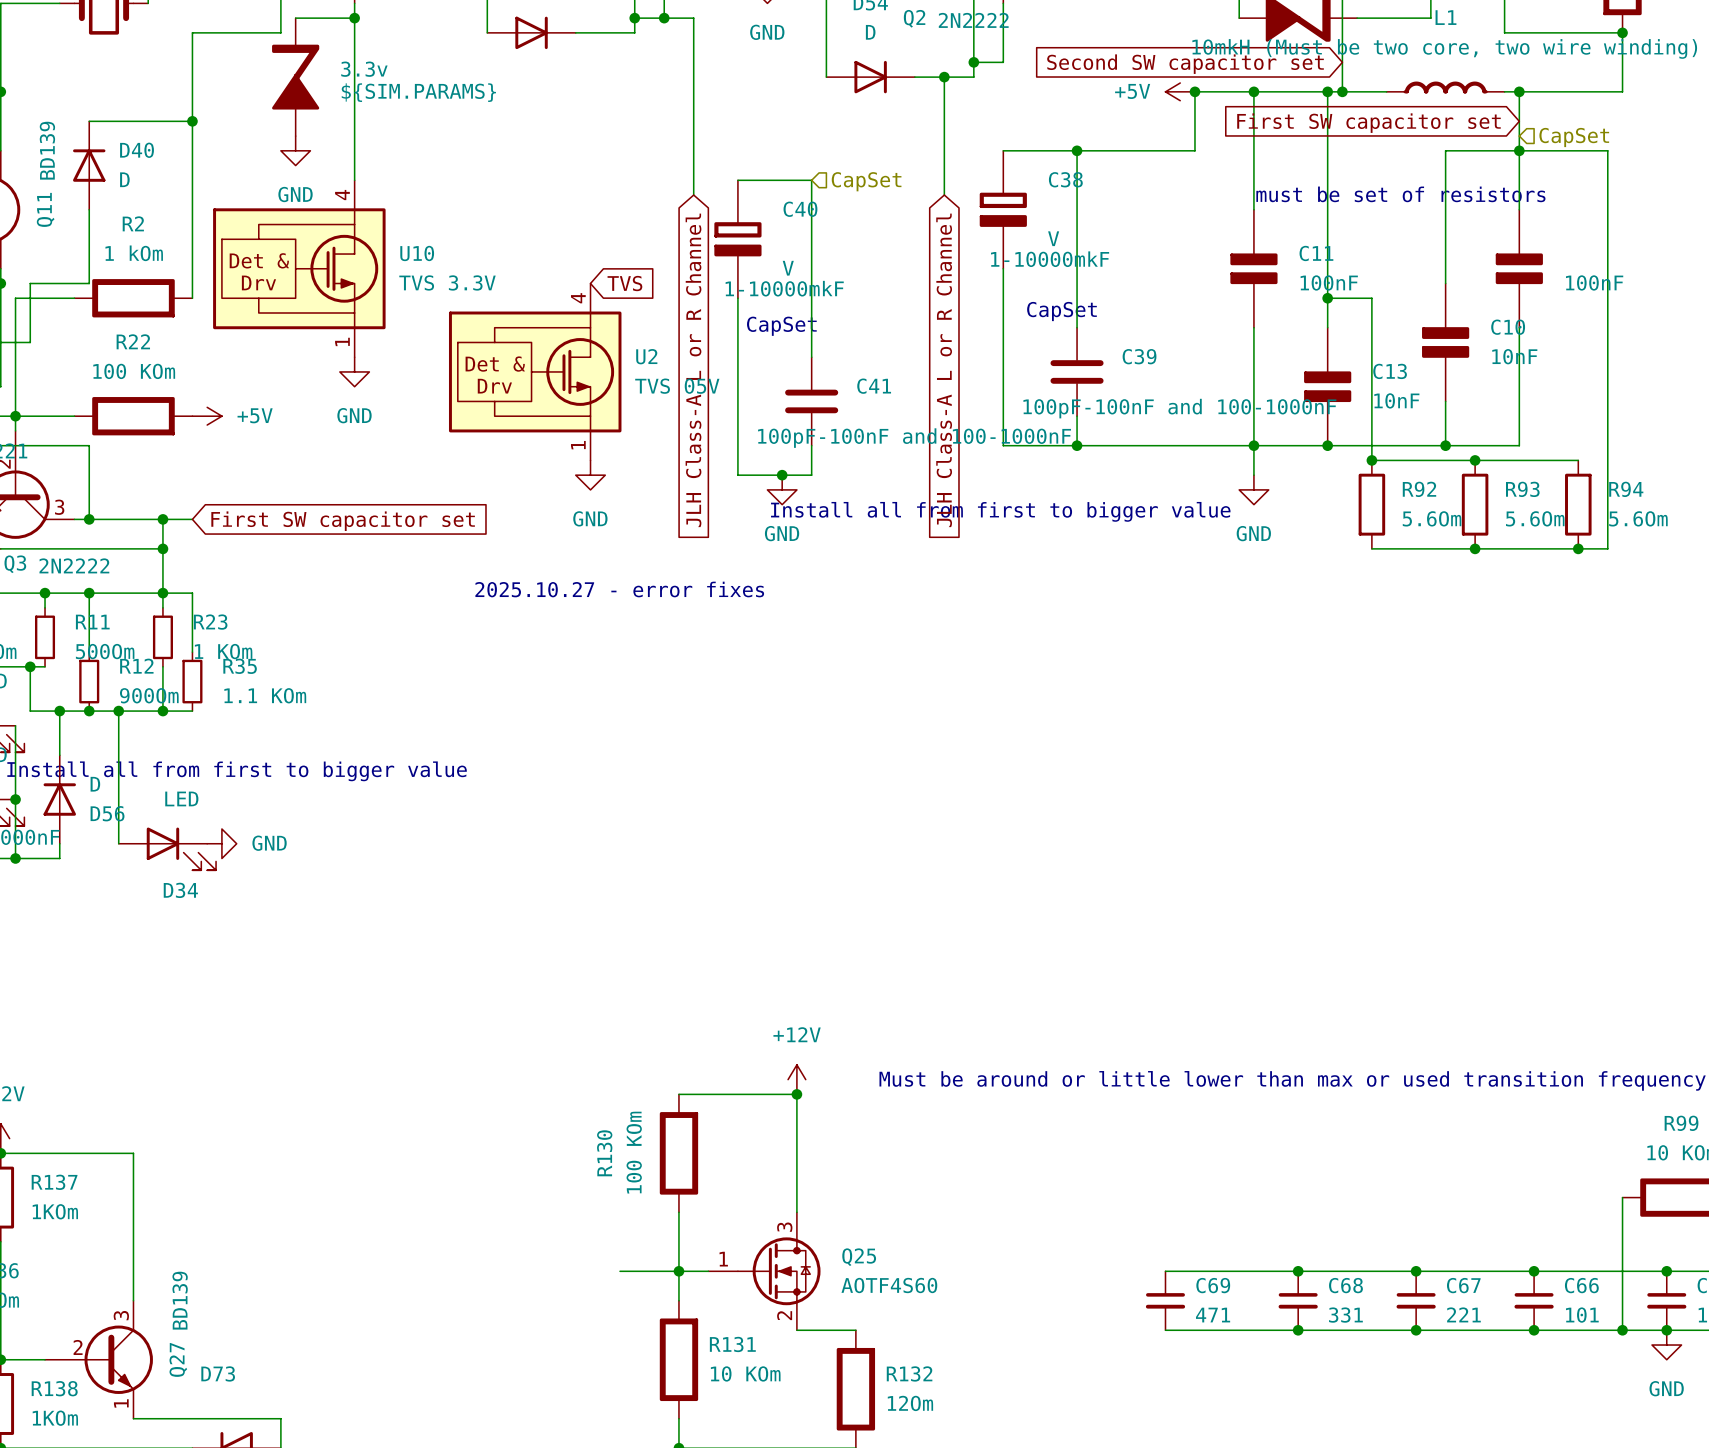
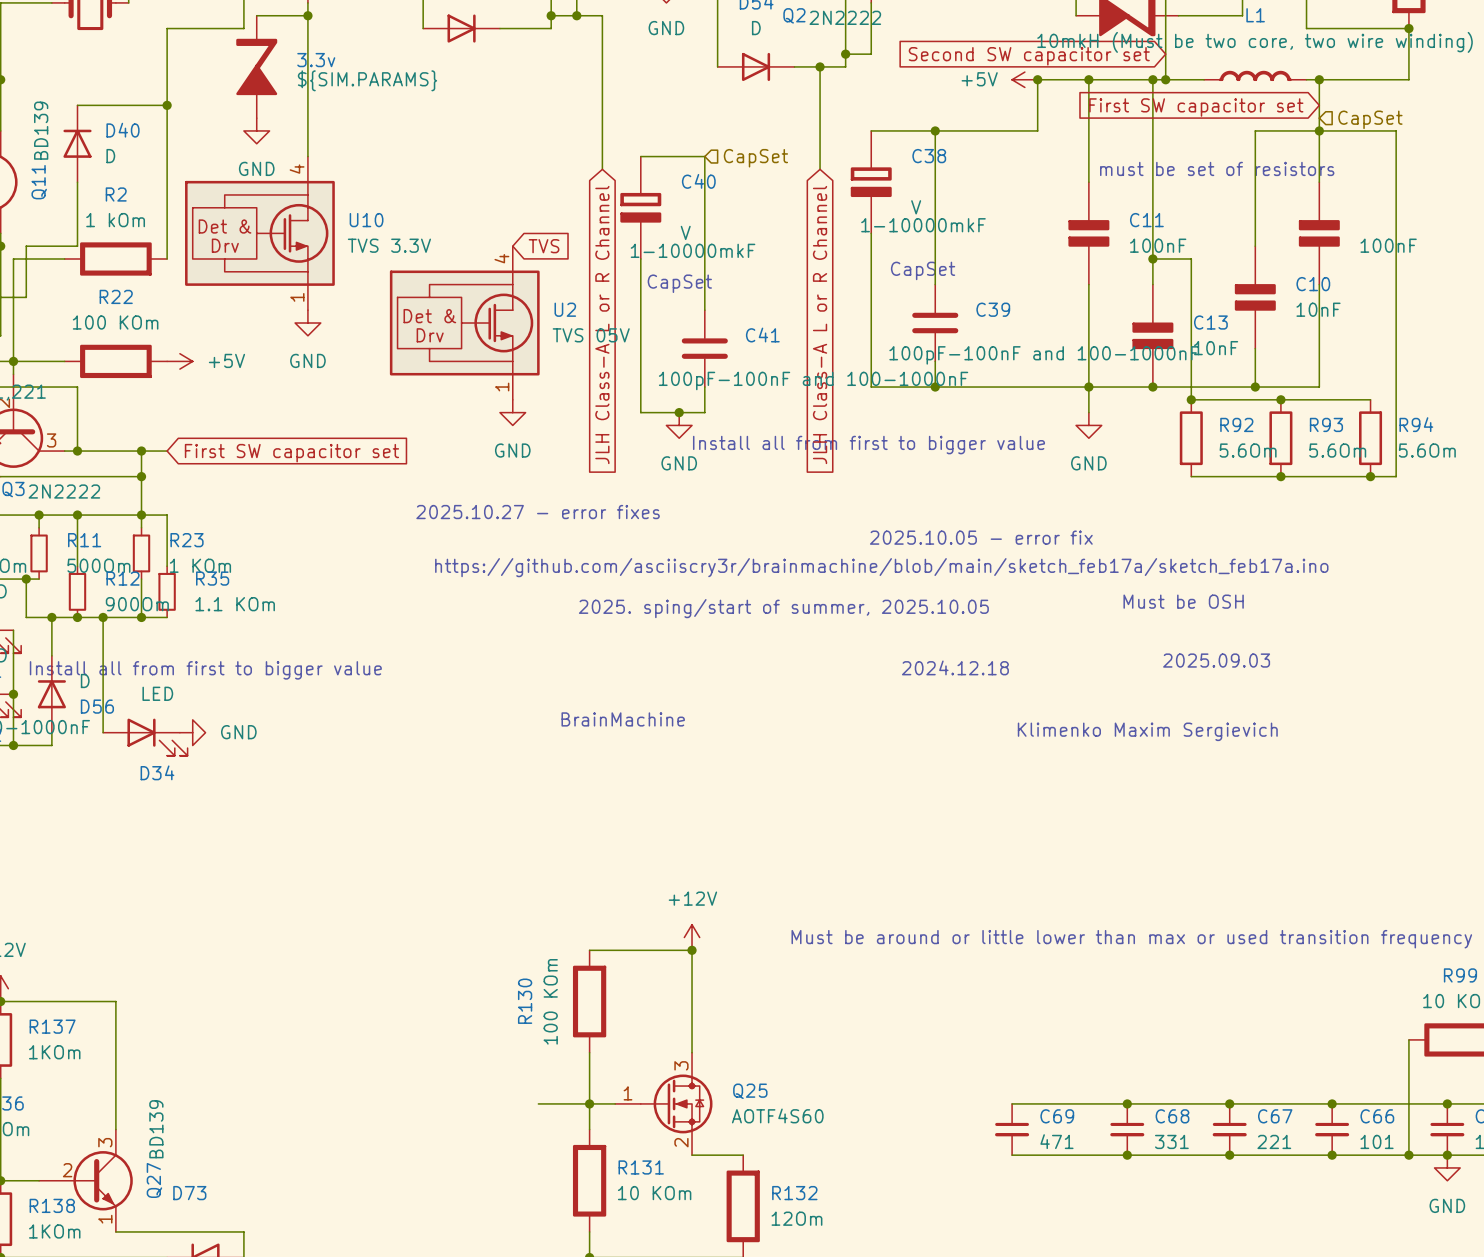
text: none -> 2025.10.05 - error fix (981, 537)
text: none -> https://github.com/asciiscry3r/brainmachine/blob/main/sketch_feb17a/sketch_feb17a.ino (881, 567)
text: none -> Must be OSH (1183, 601)
text: none -> 2025. sping/start of summer, 2025.10.05 (783, 608)
text: none -> 2025.09.03 (1216, 660)
text: none -> 2024.12.18 (955, 667)
text: none -> BrainMachine (623, 719)
text: none -> Klimenko Maxim Sergievich (1147, 731)

